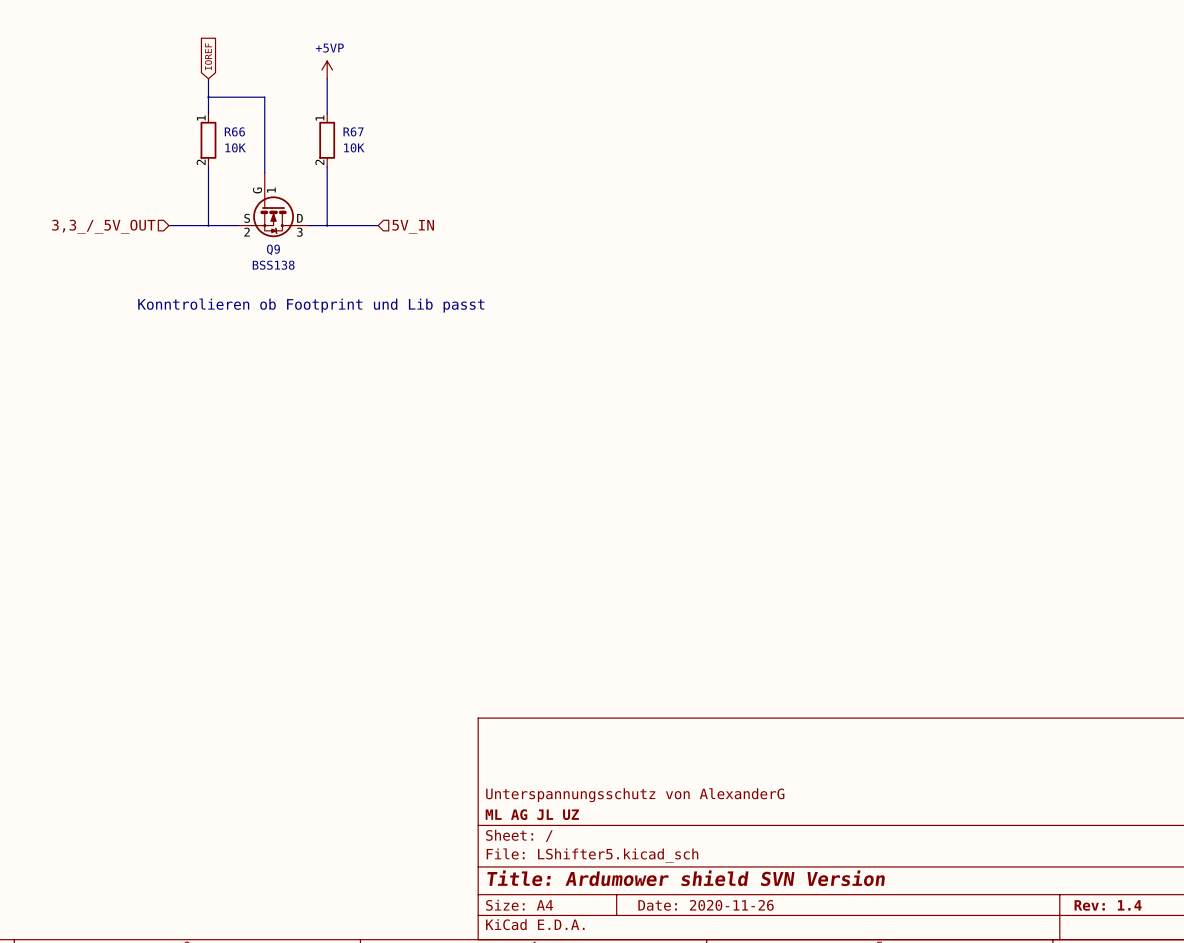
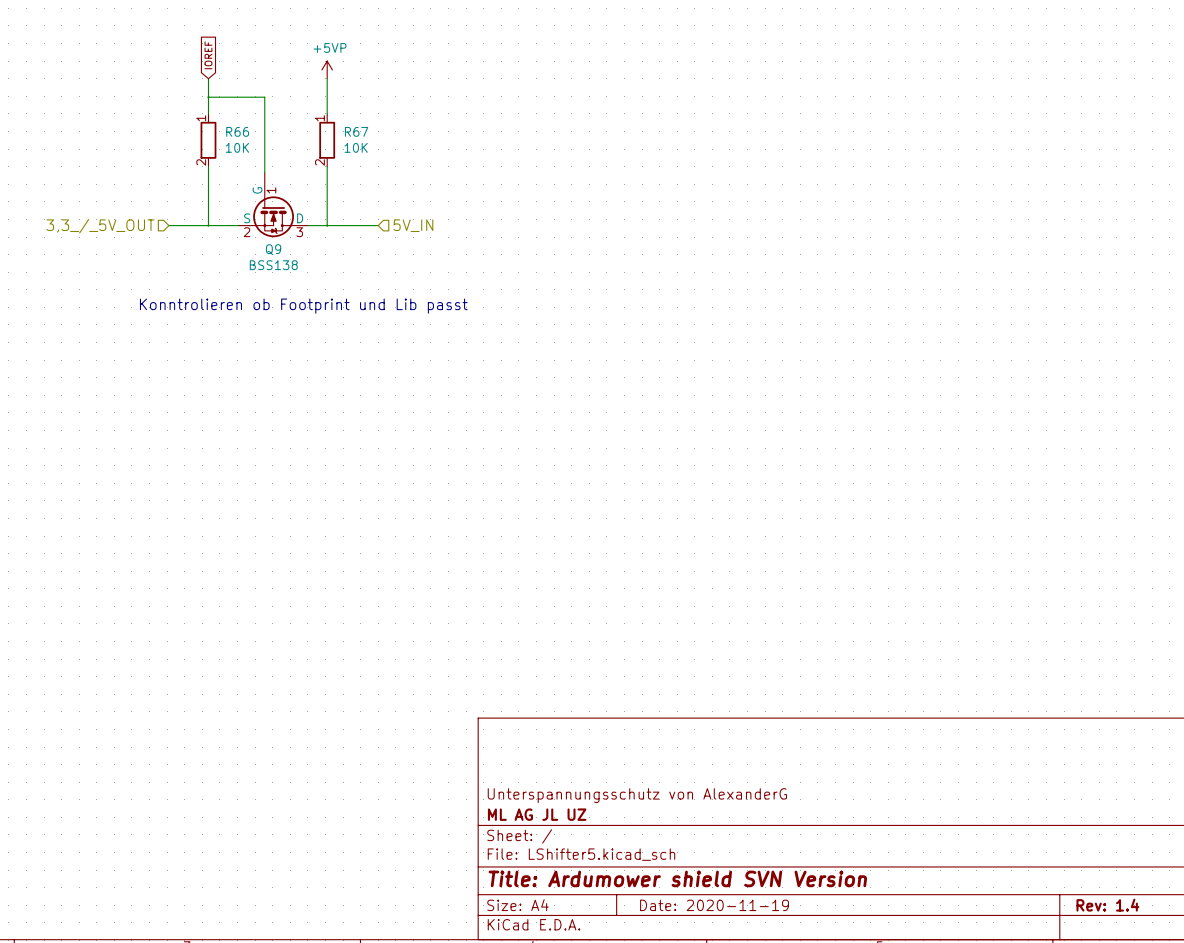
title block: Date: 2020-11-26 (706, 905) -> Date: 2020-11-19 (714, 905)

